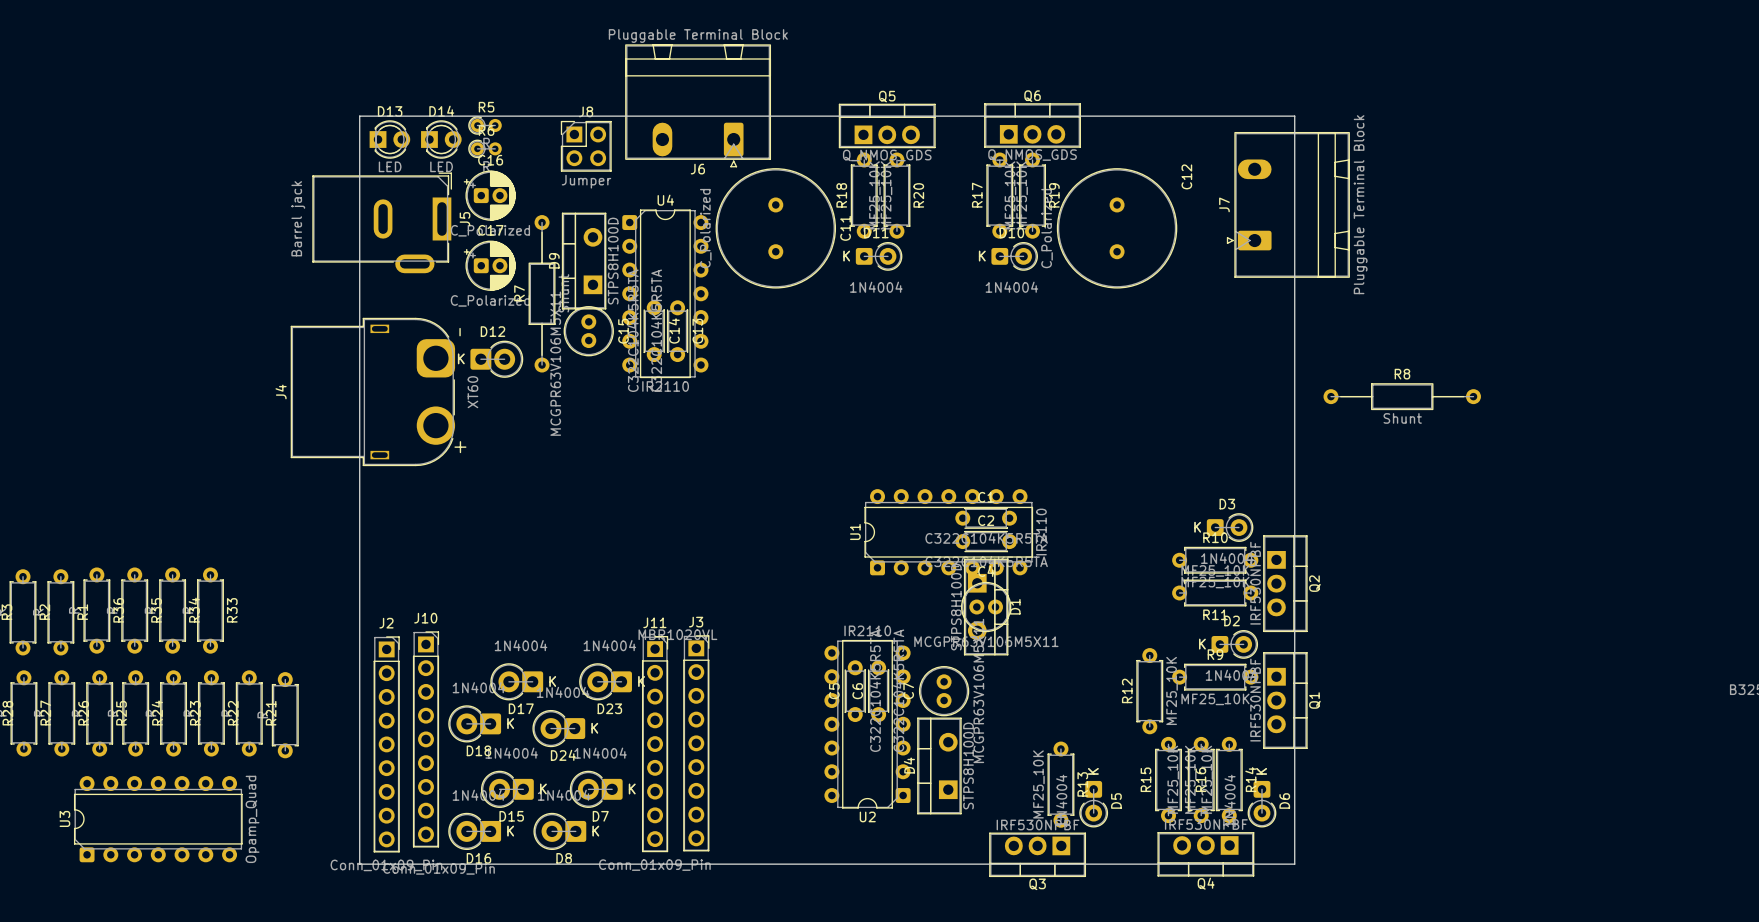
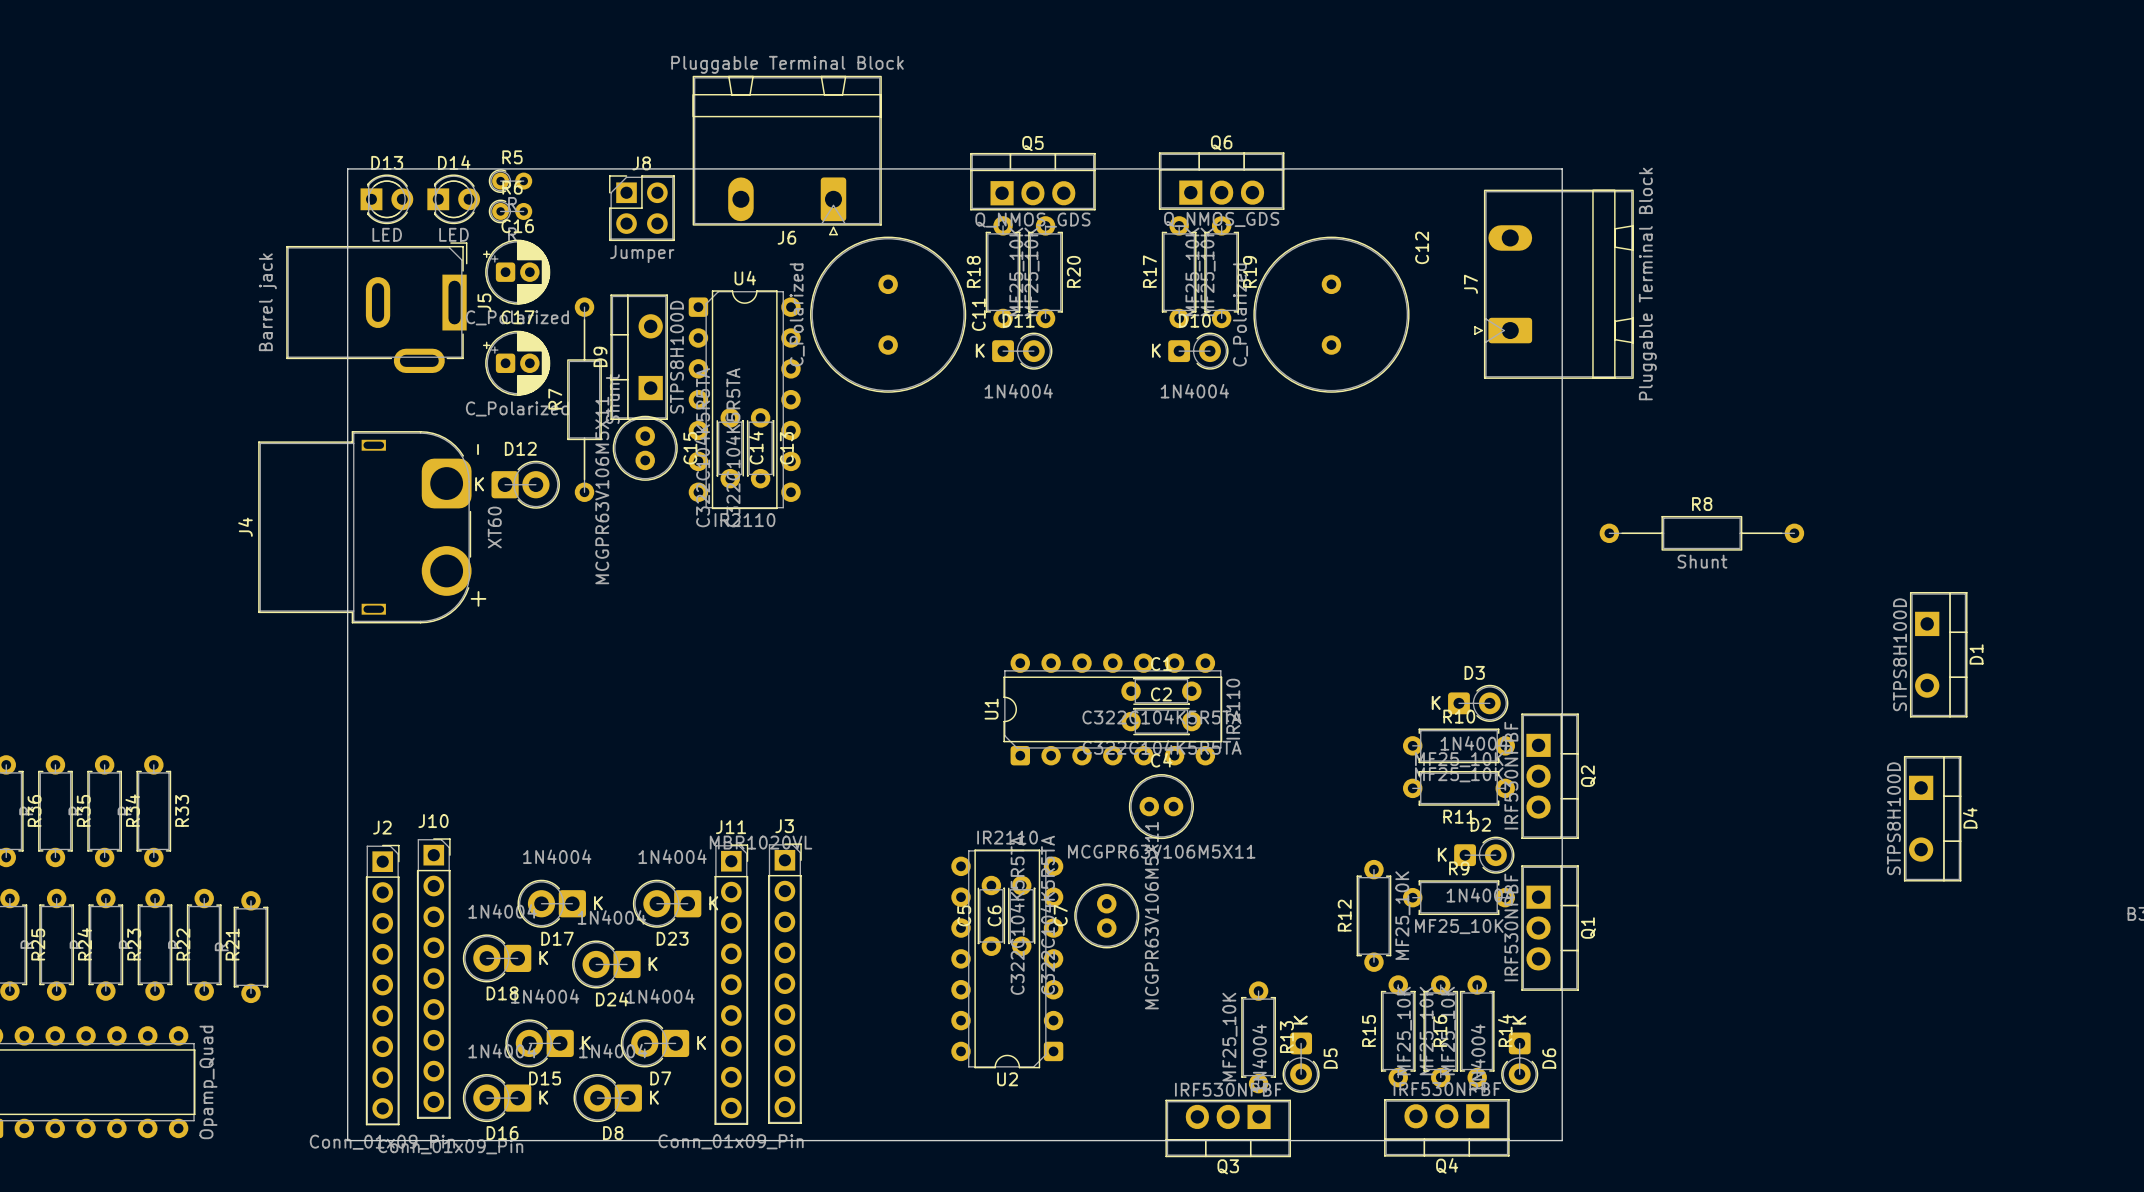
D1 position: (986, 607) -> (1938, 654)
D4 rotation: 0° (939, 765) -> 180° (1932, 818)
D4 position: (939, 765) -> (1932, 818)

